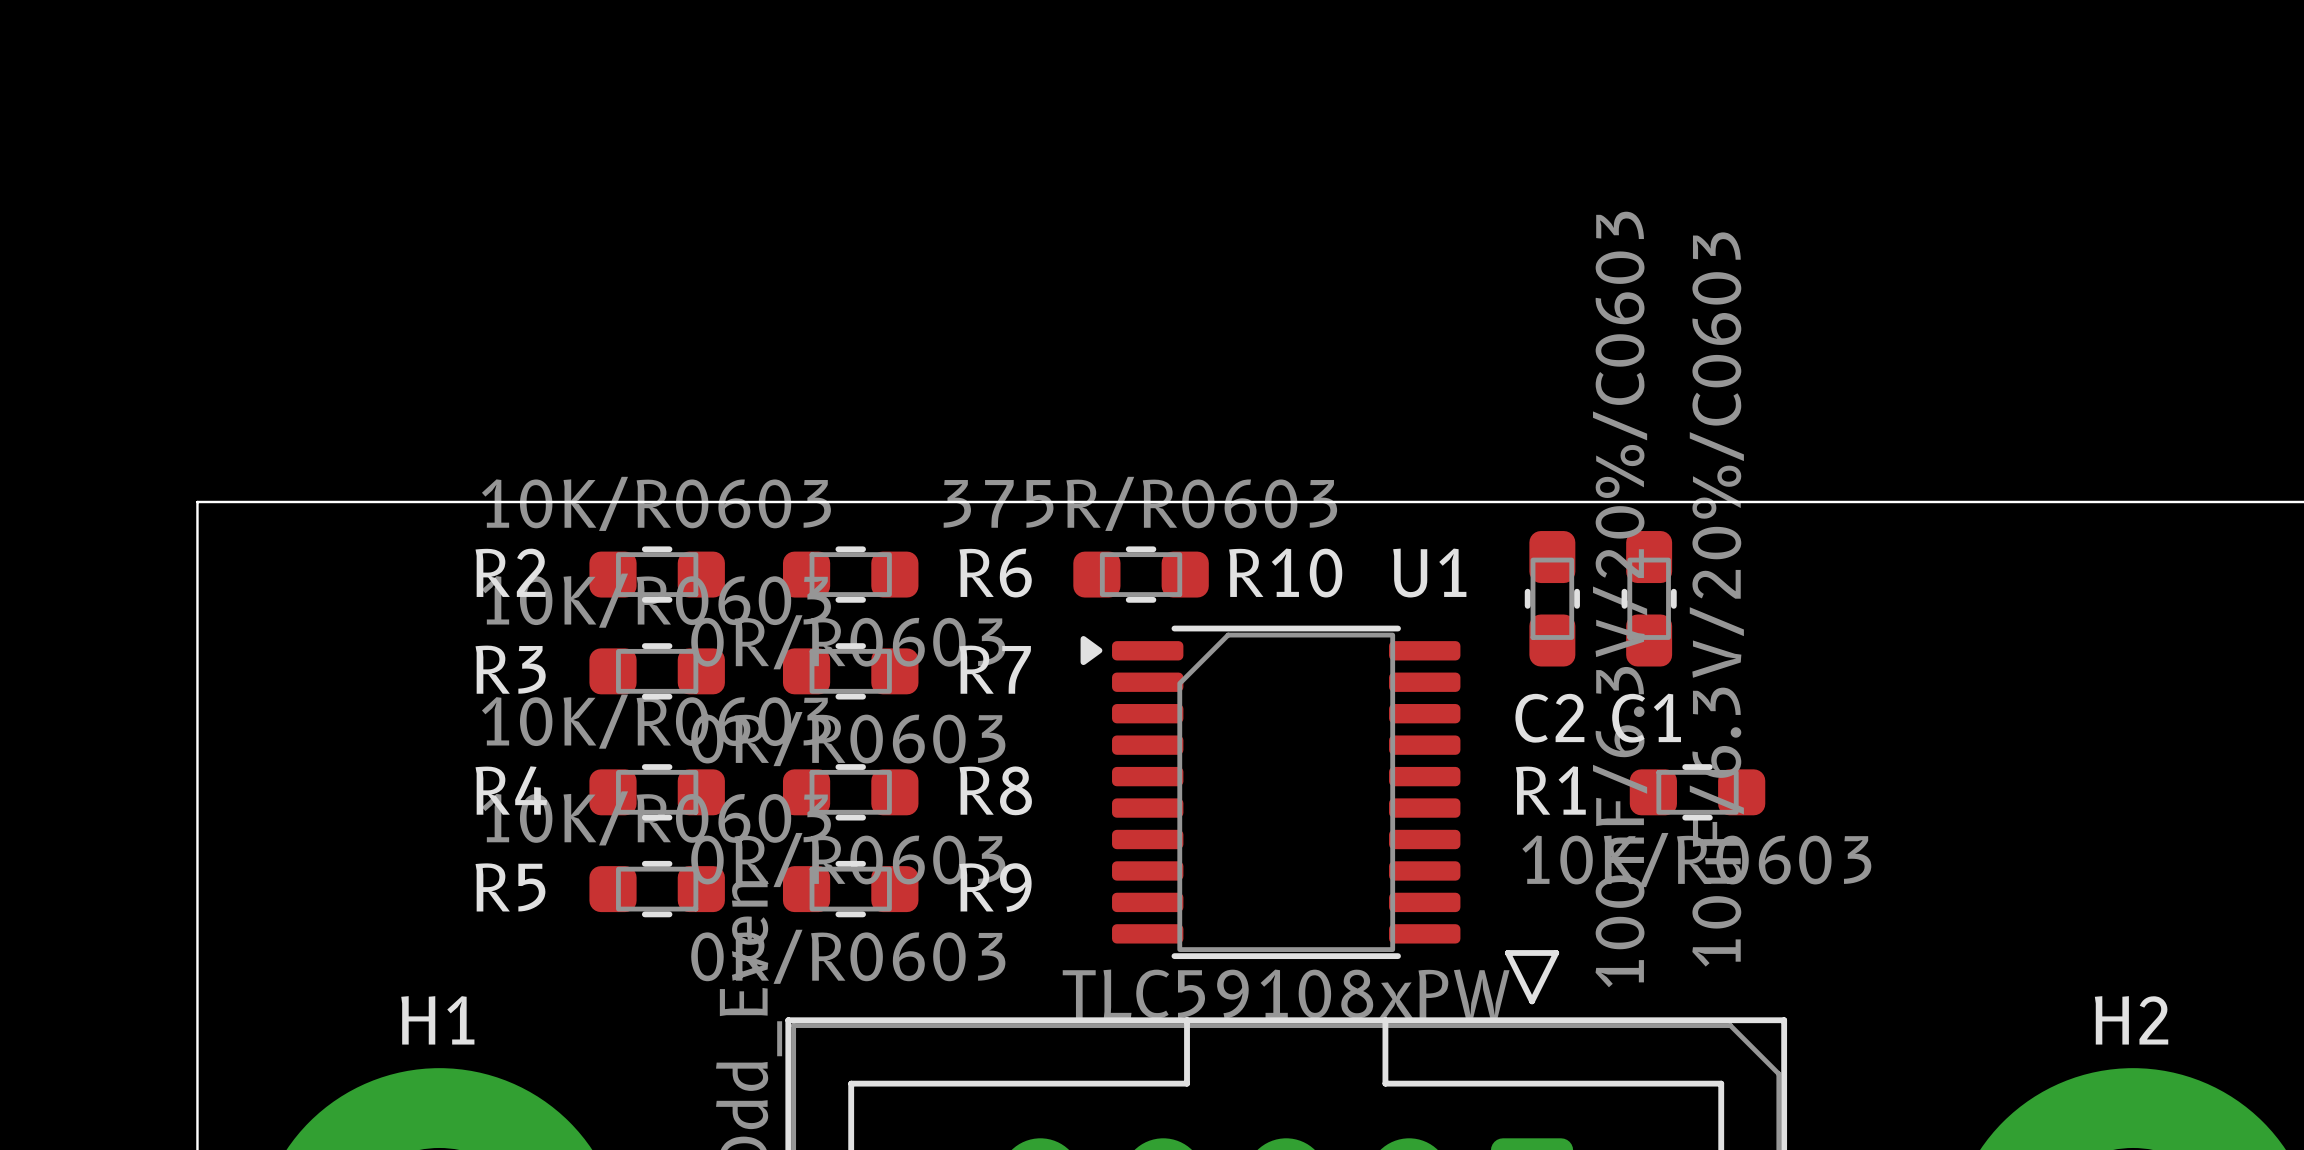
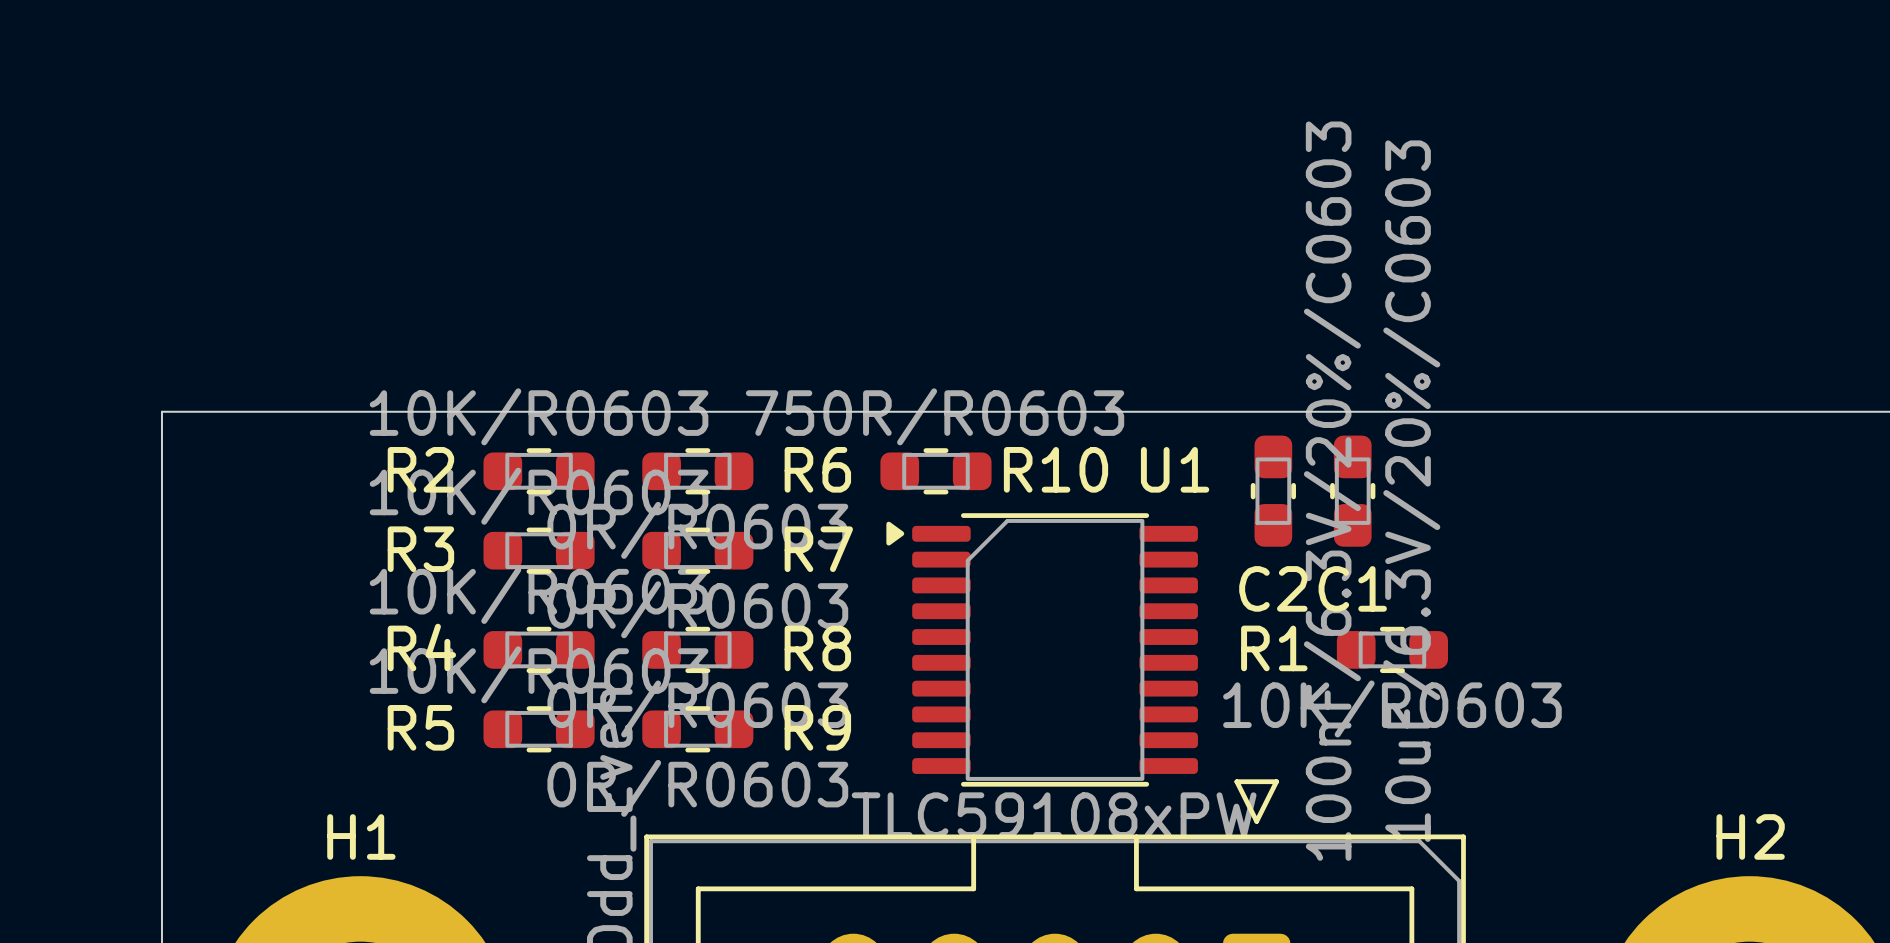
R10 value: 375R/R0603 (1140, 503) -> 750R/R0603 (935, 416)

